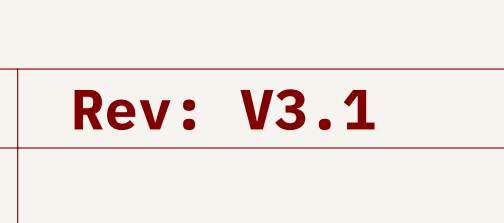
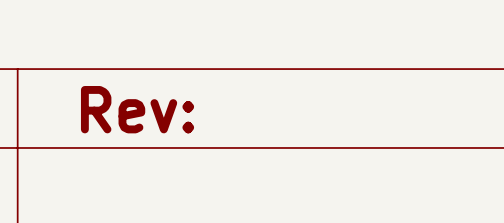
title block: Rev: V3.1 (224, 109) -> Rev: (137, 109)

